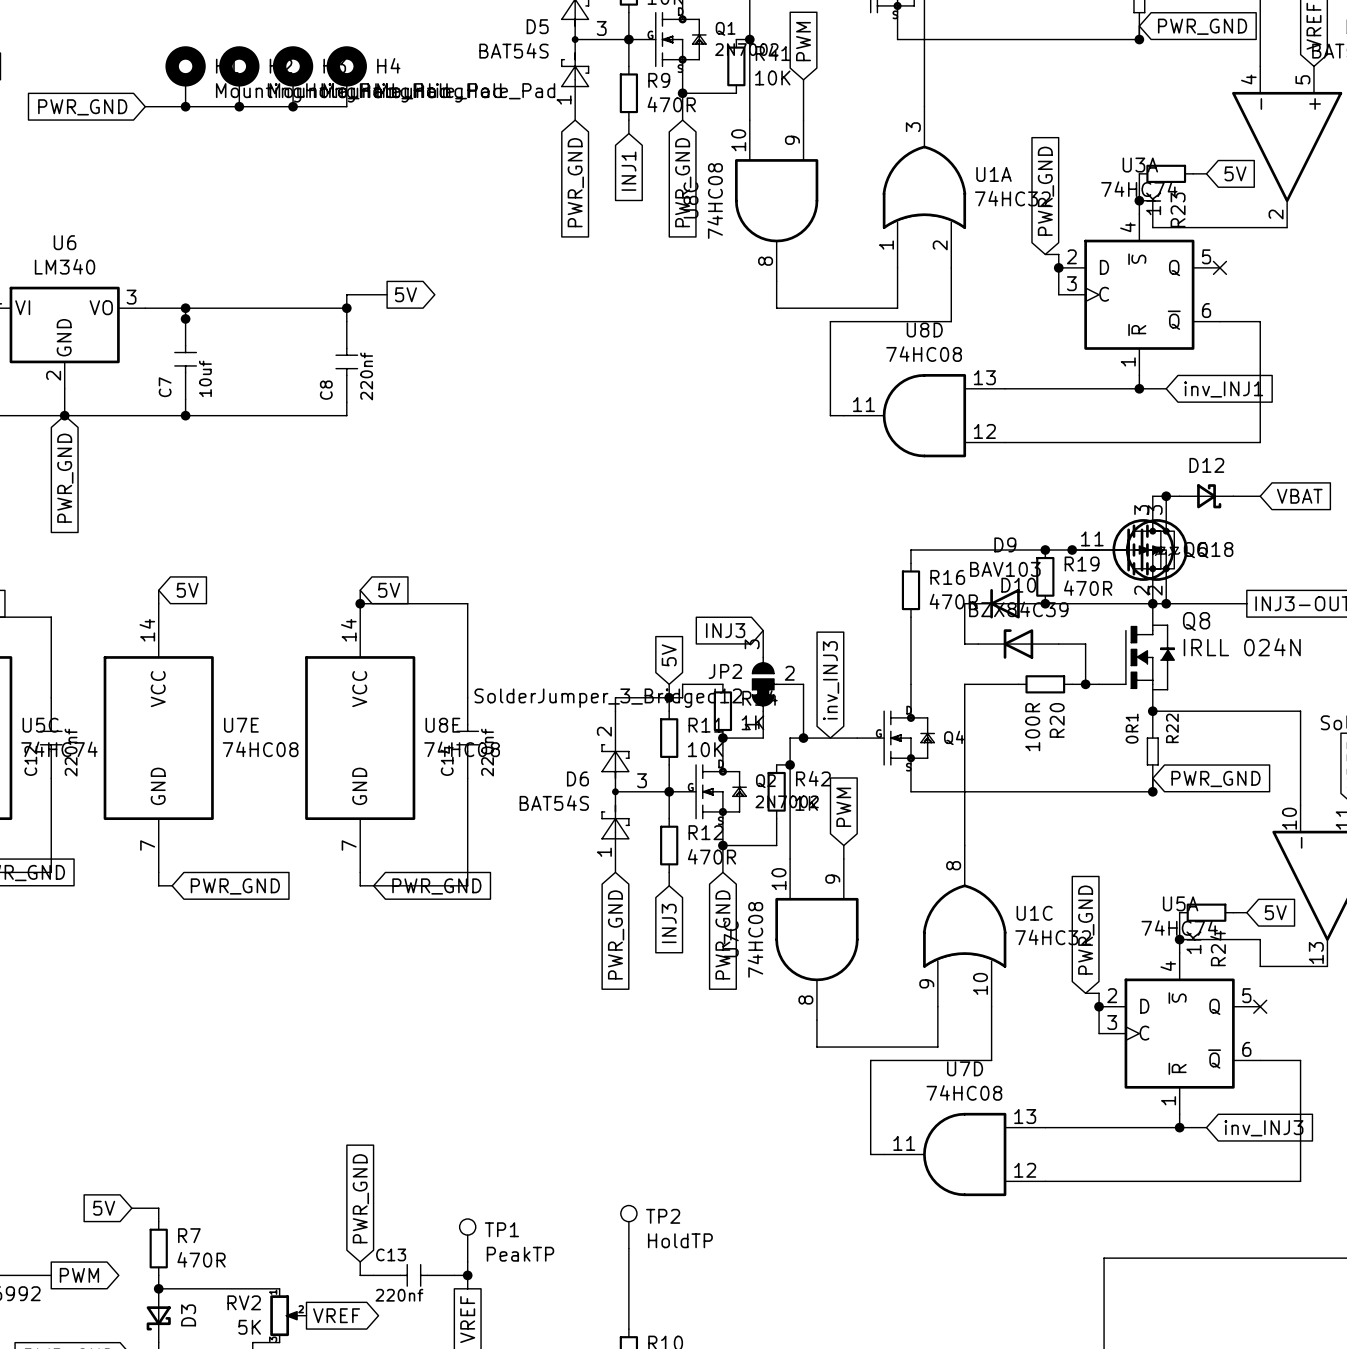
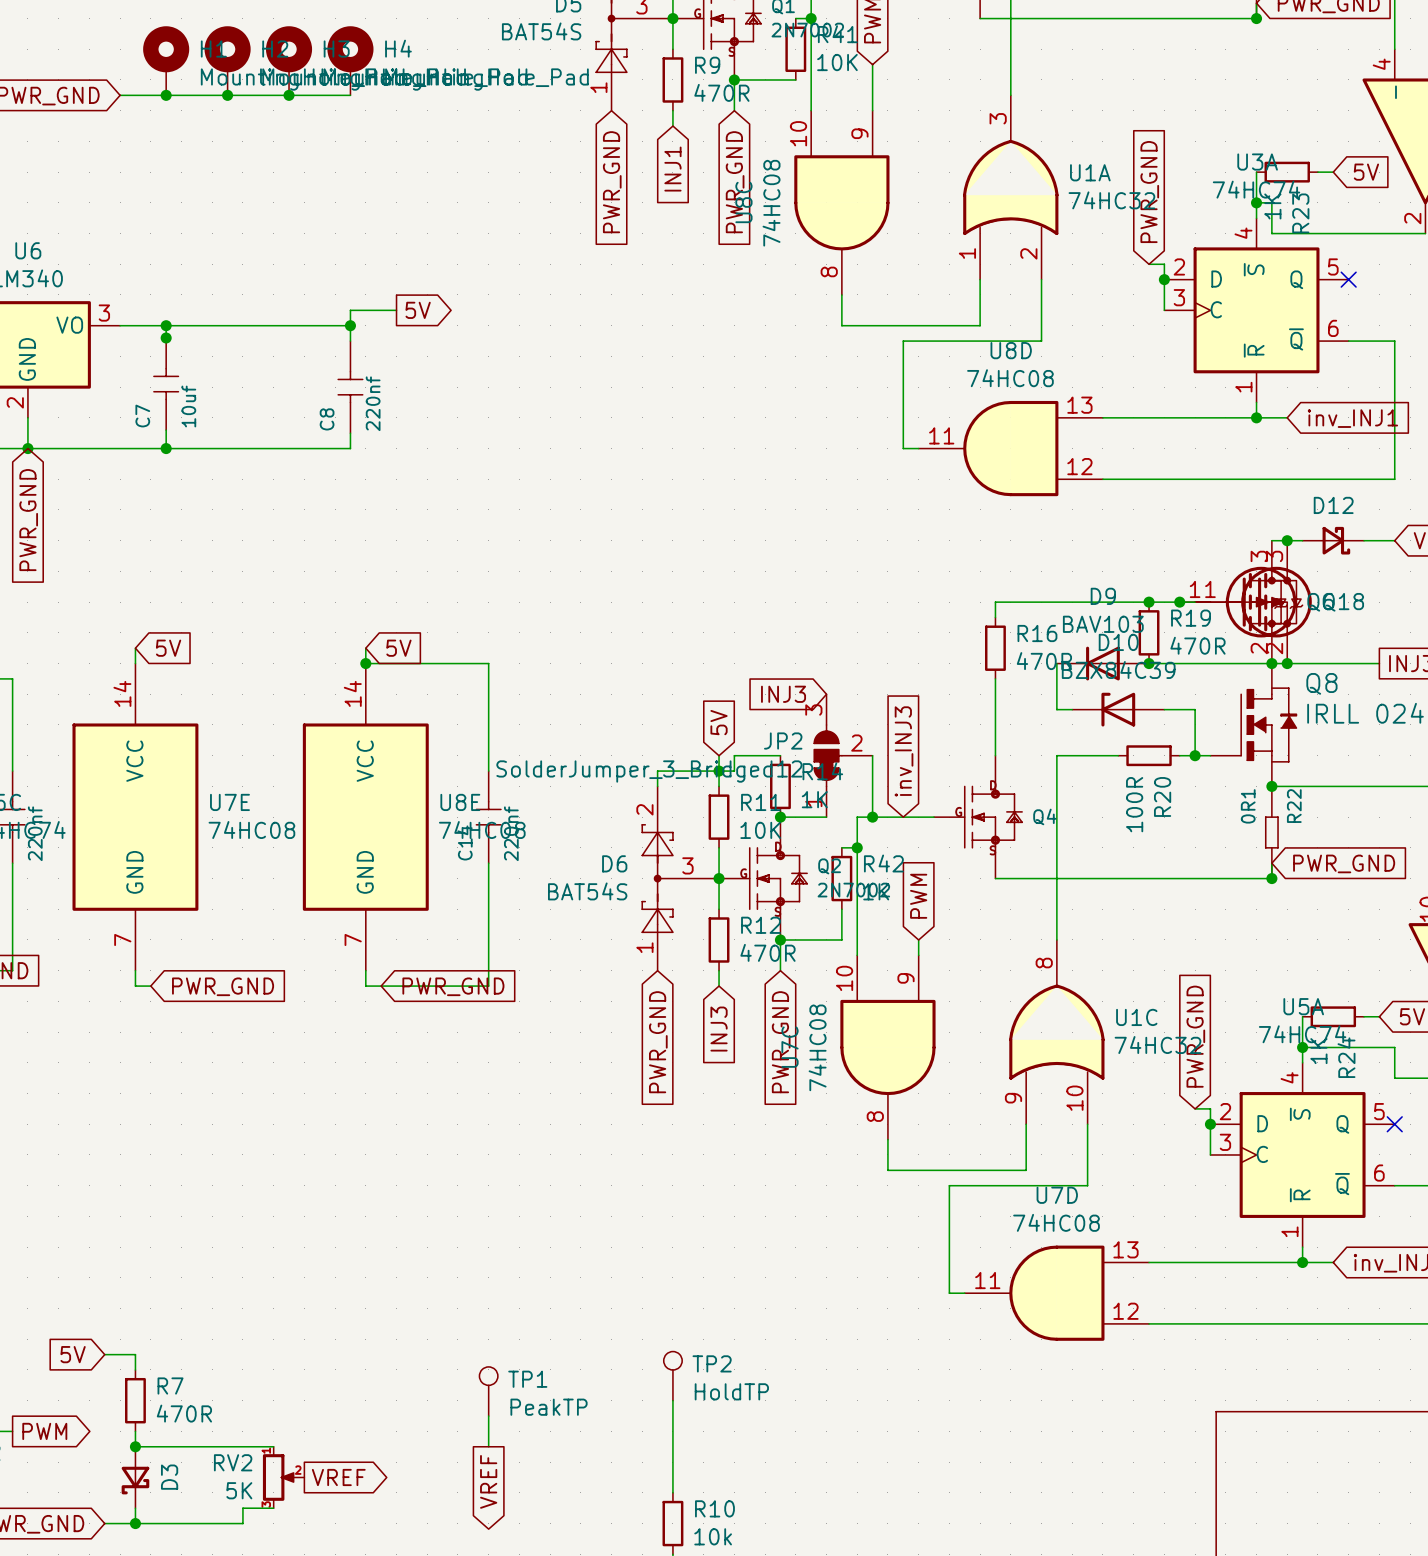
global label: PWR_GND (360, 1198) -> none
wire: (360, 1261) (360, 1275) (373, 1275) -> none
C13: 220nf (413, 1275) -> none
wire: (454, 1275) (467, 1275) -> none
junction: (467, 1275) -> none

